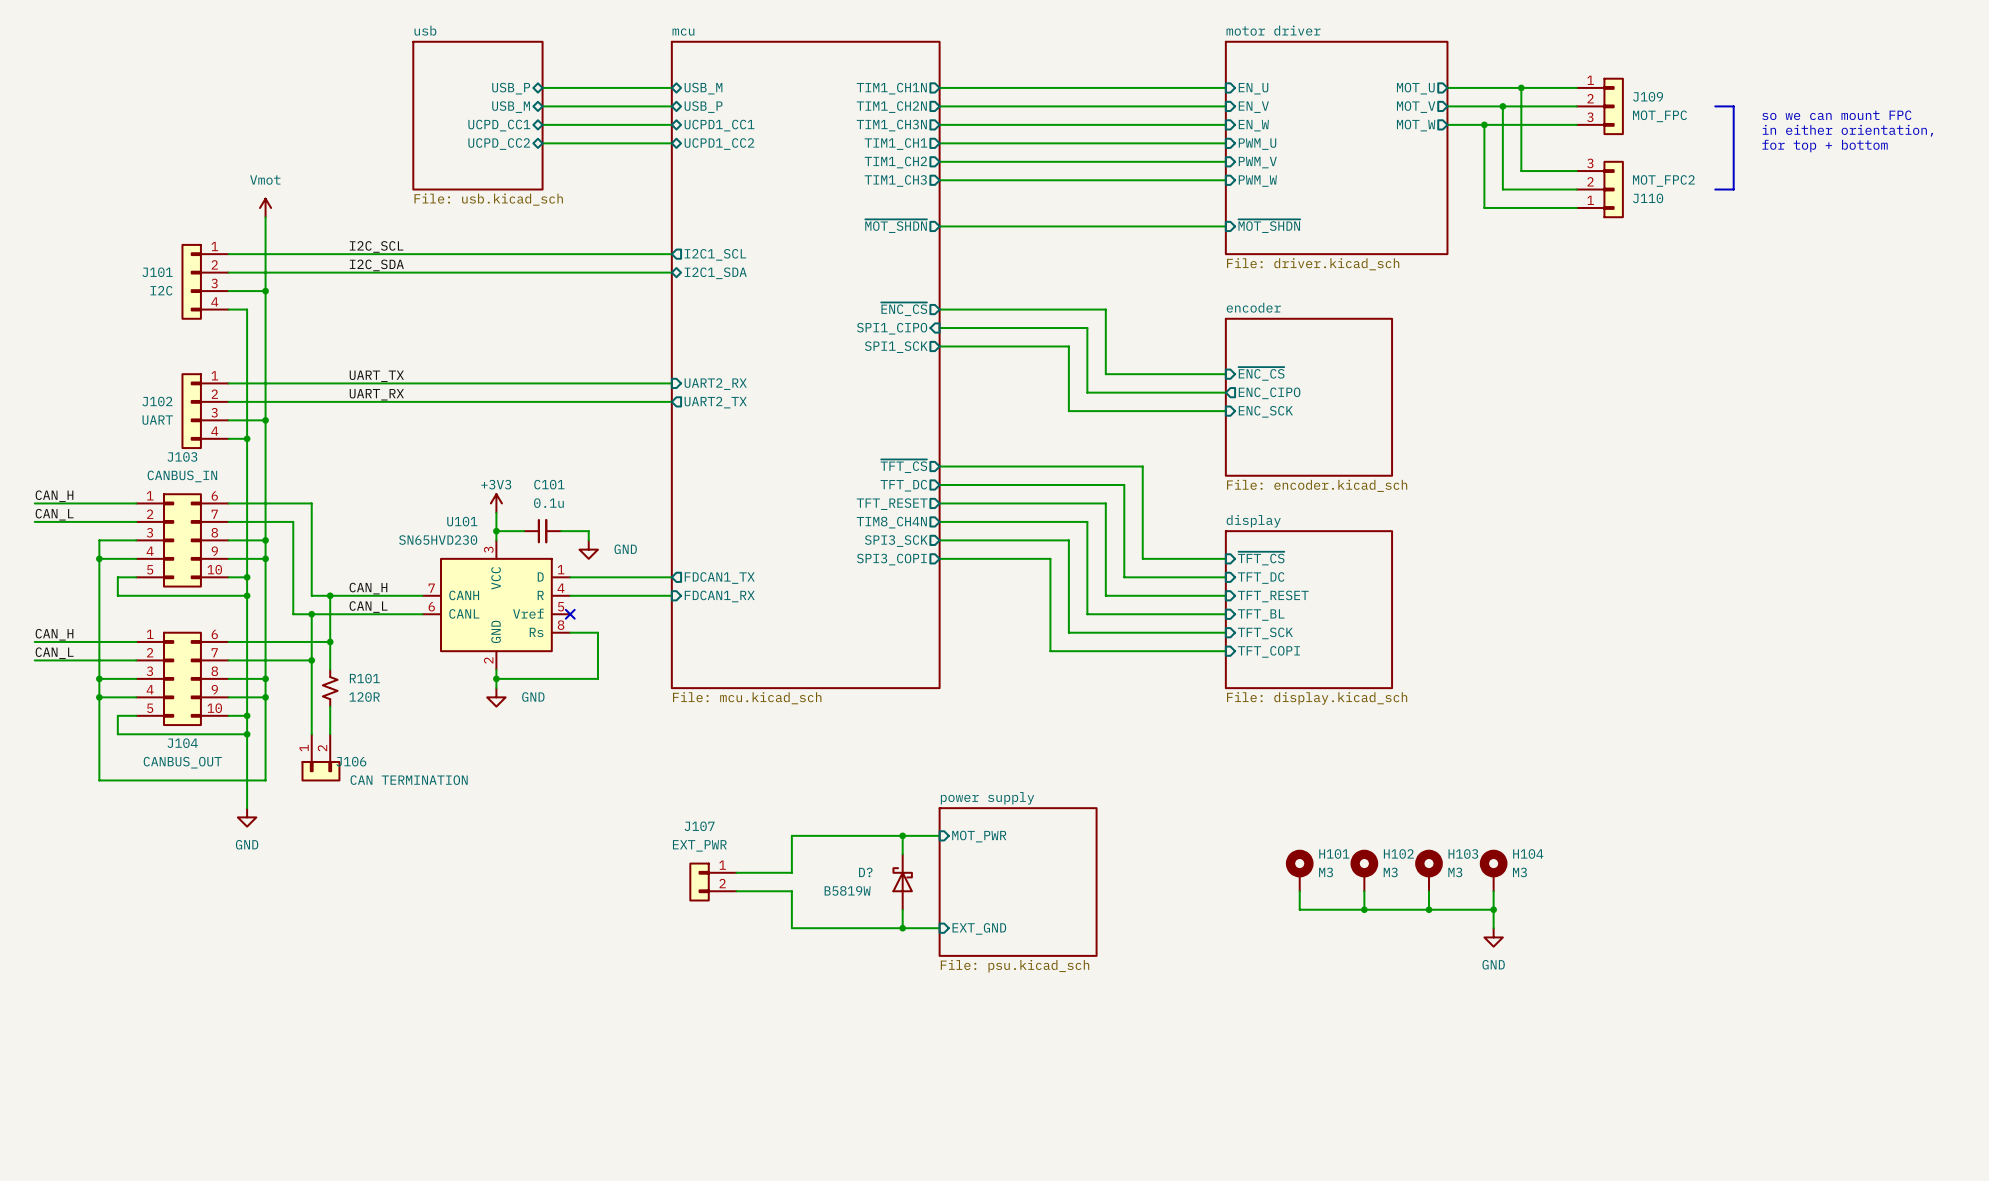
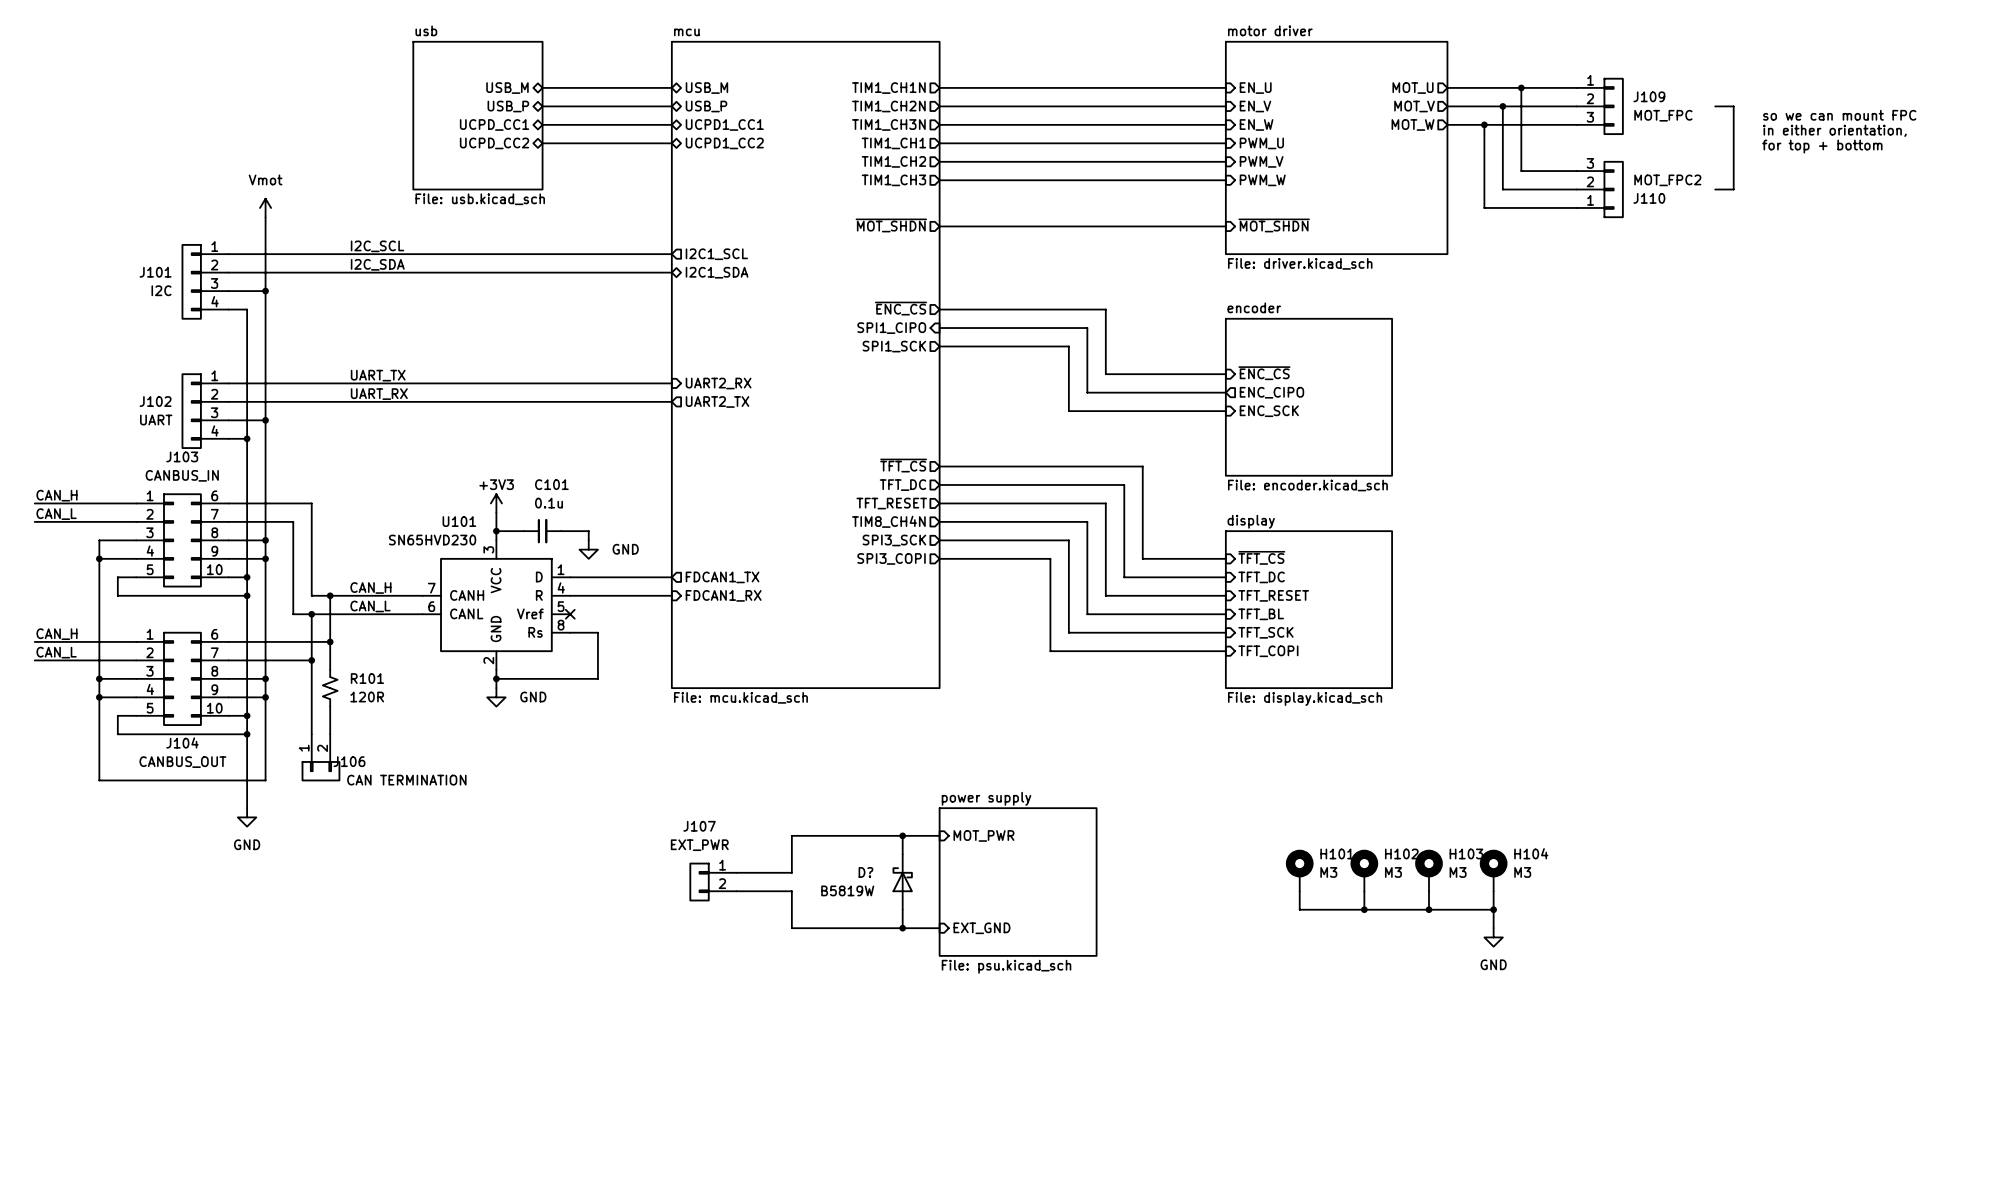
sheet pin: USB_P (511, 88) -> USB_M (507, 88)
sheet pin: USB_M (511, 107) -> USB_P (508, 106)

